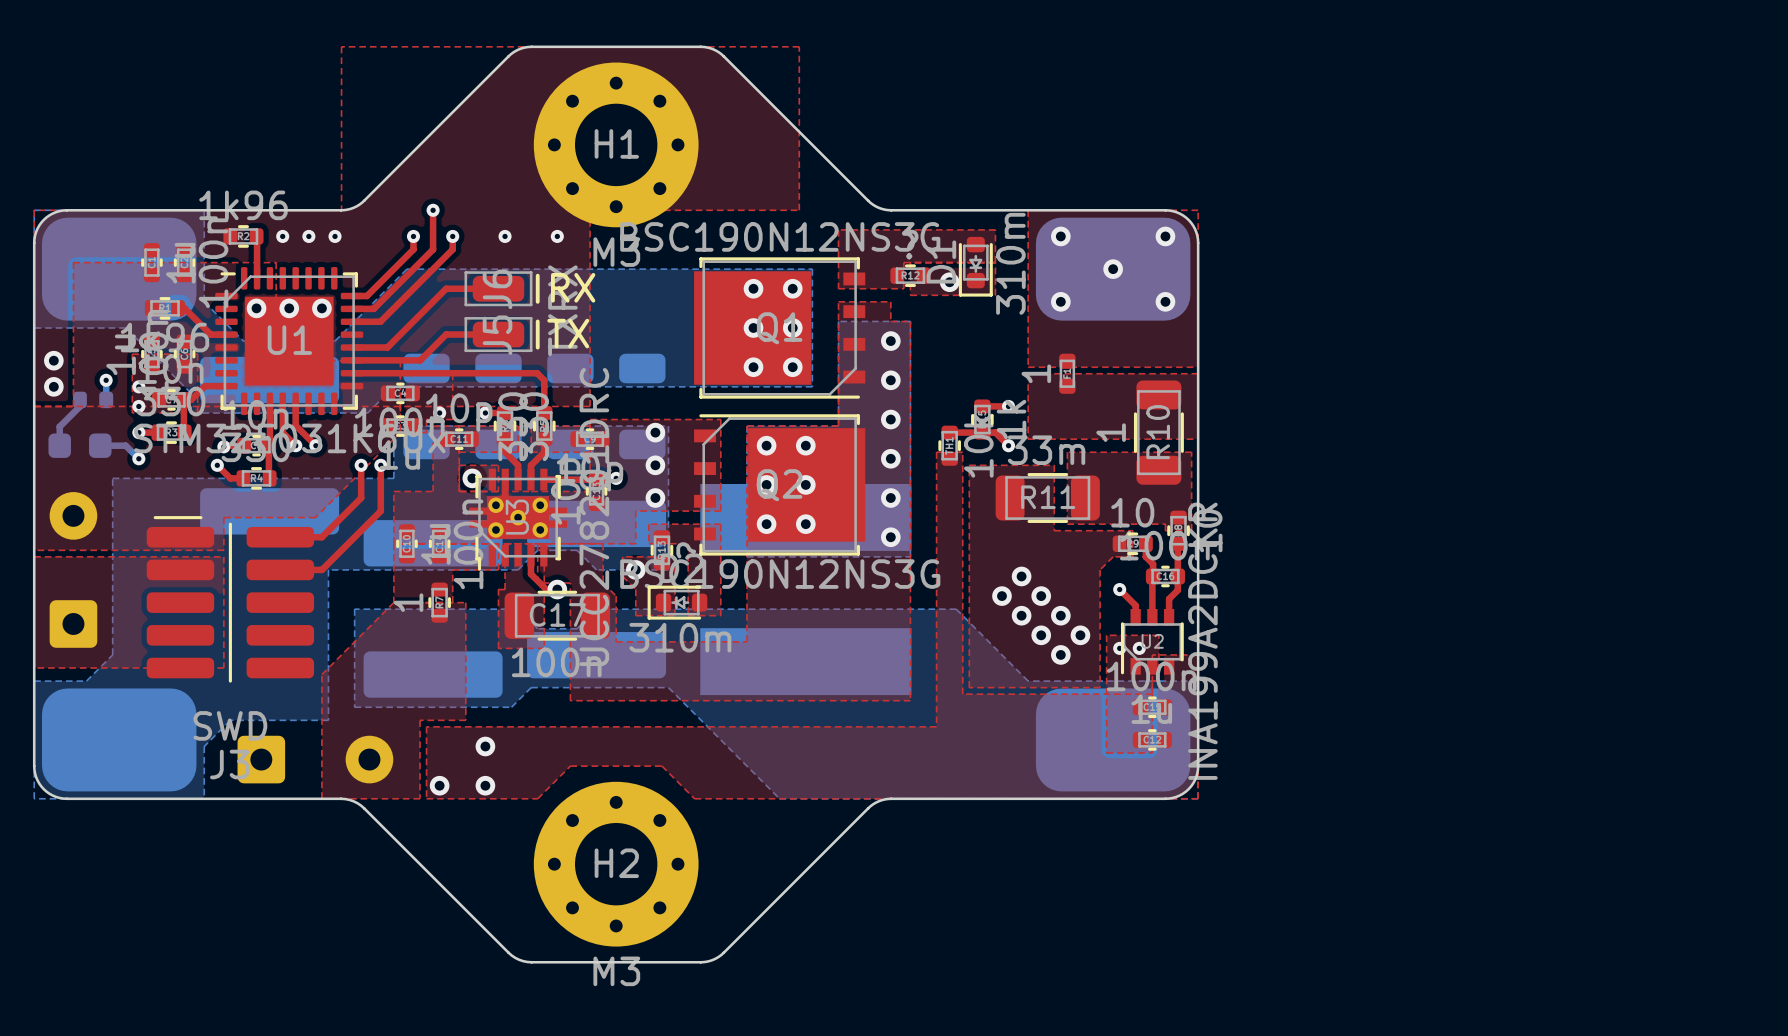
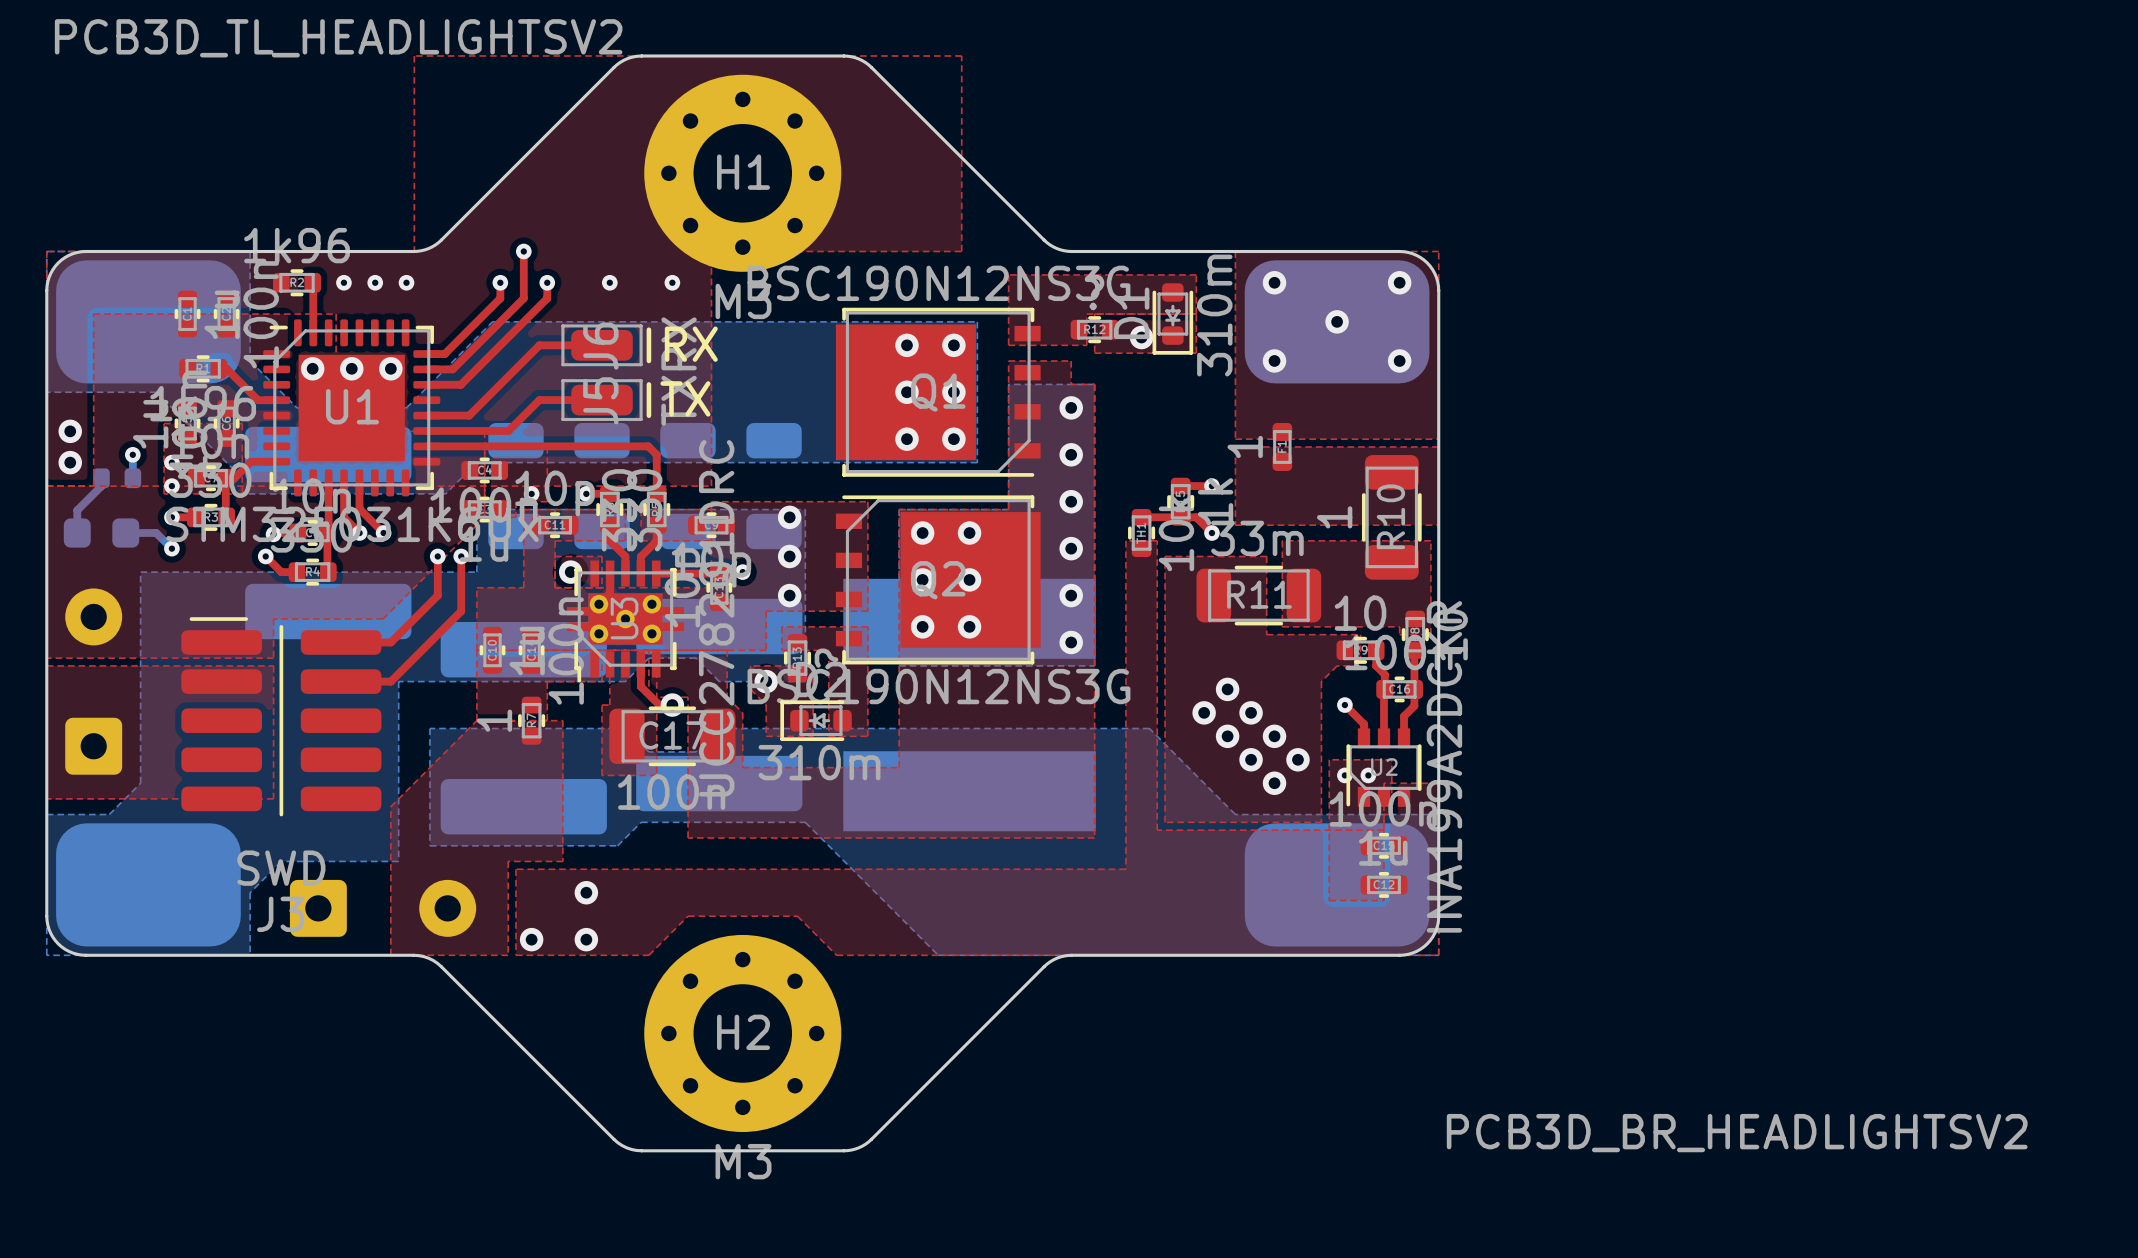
text: none -> PCB3D_TL_HEADLIGHTSV2 (338, 38)
text: none -> PCB3D_BR_HEADLIGHTSV2 (1737, 1133)

